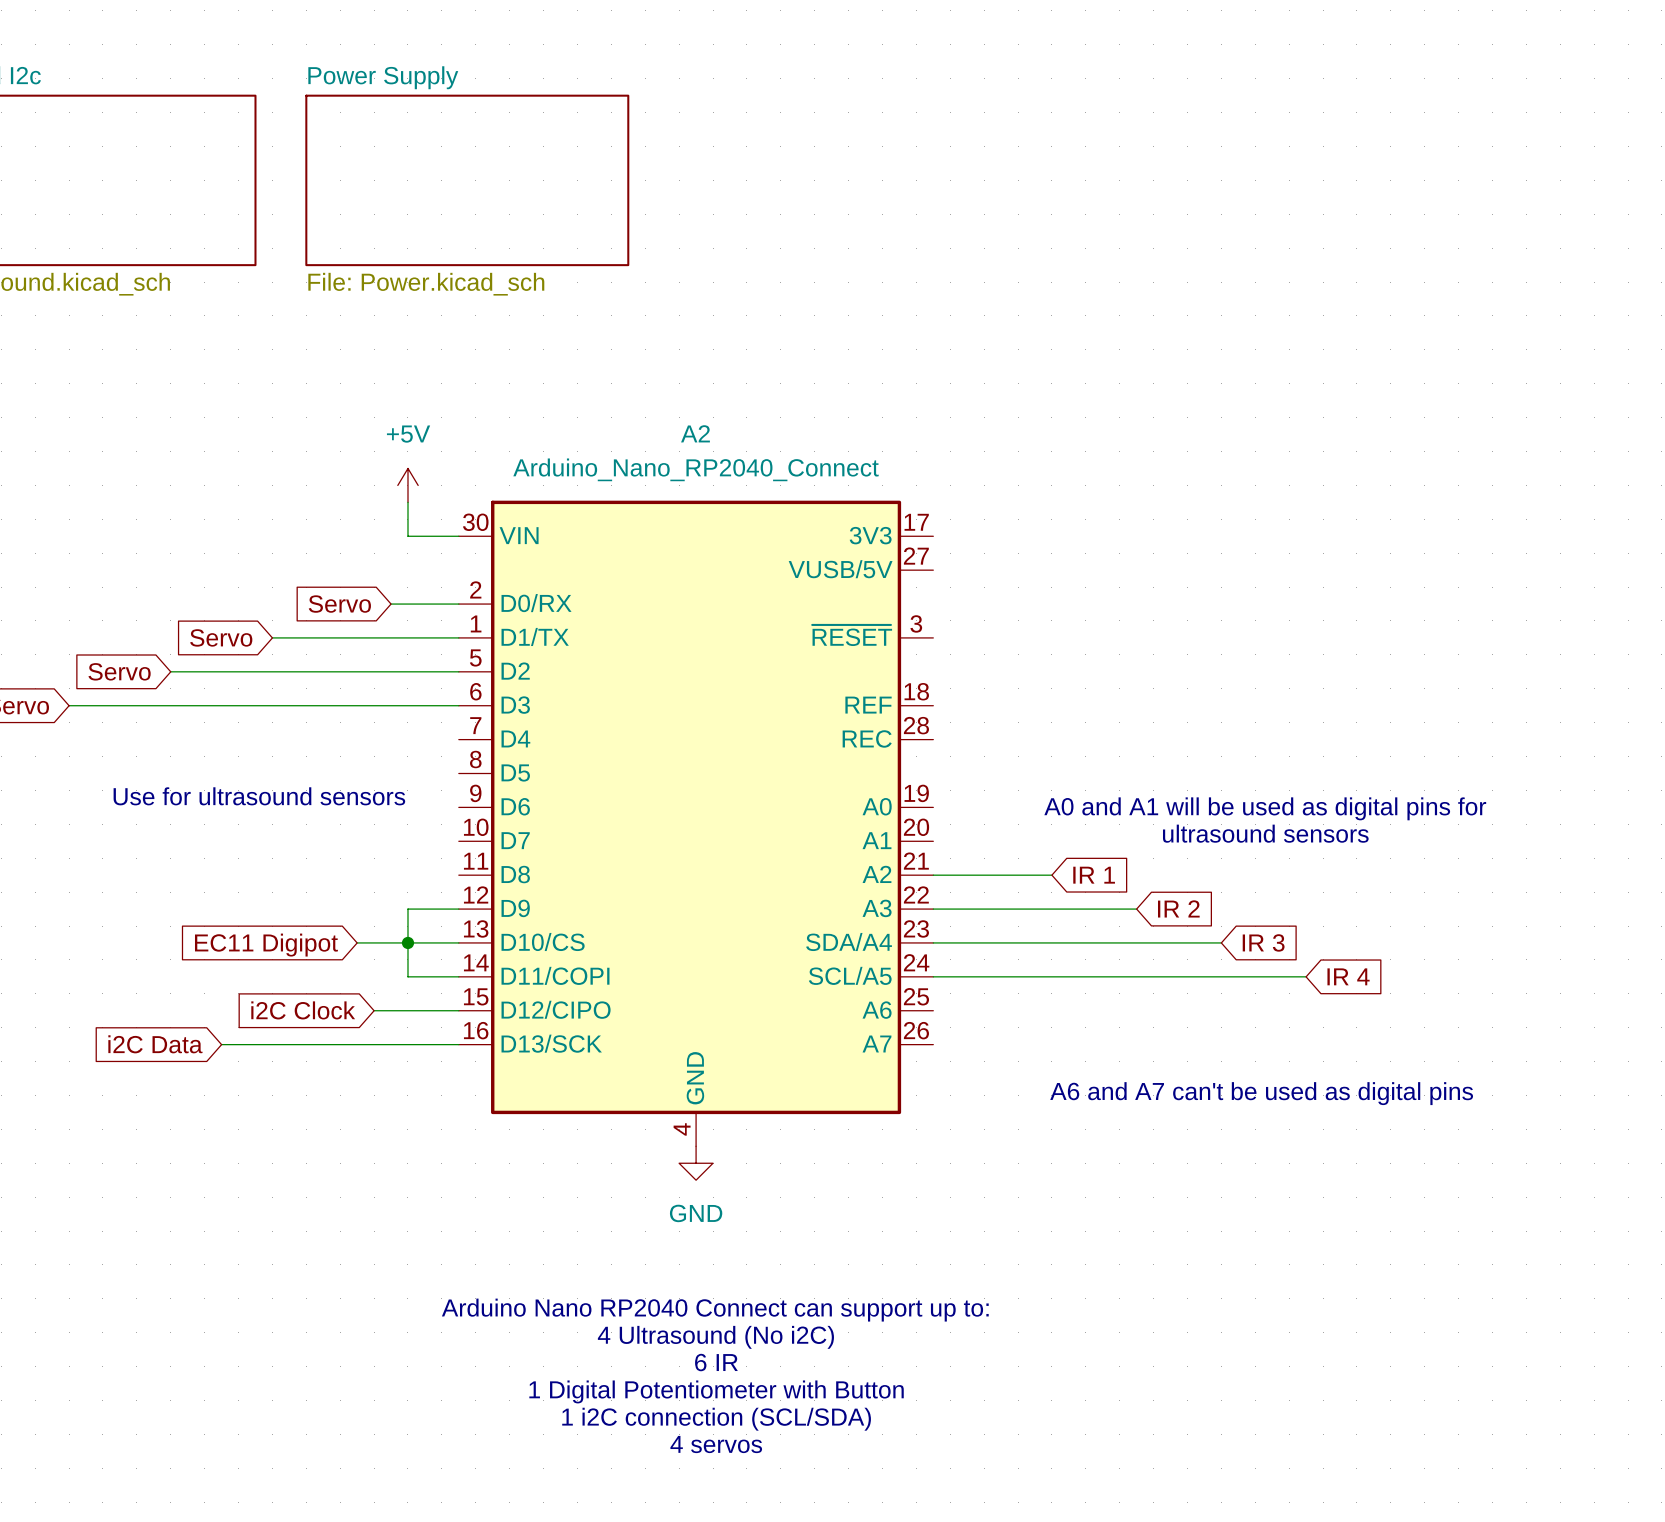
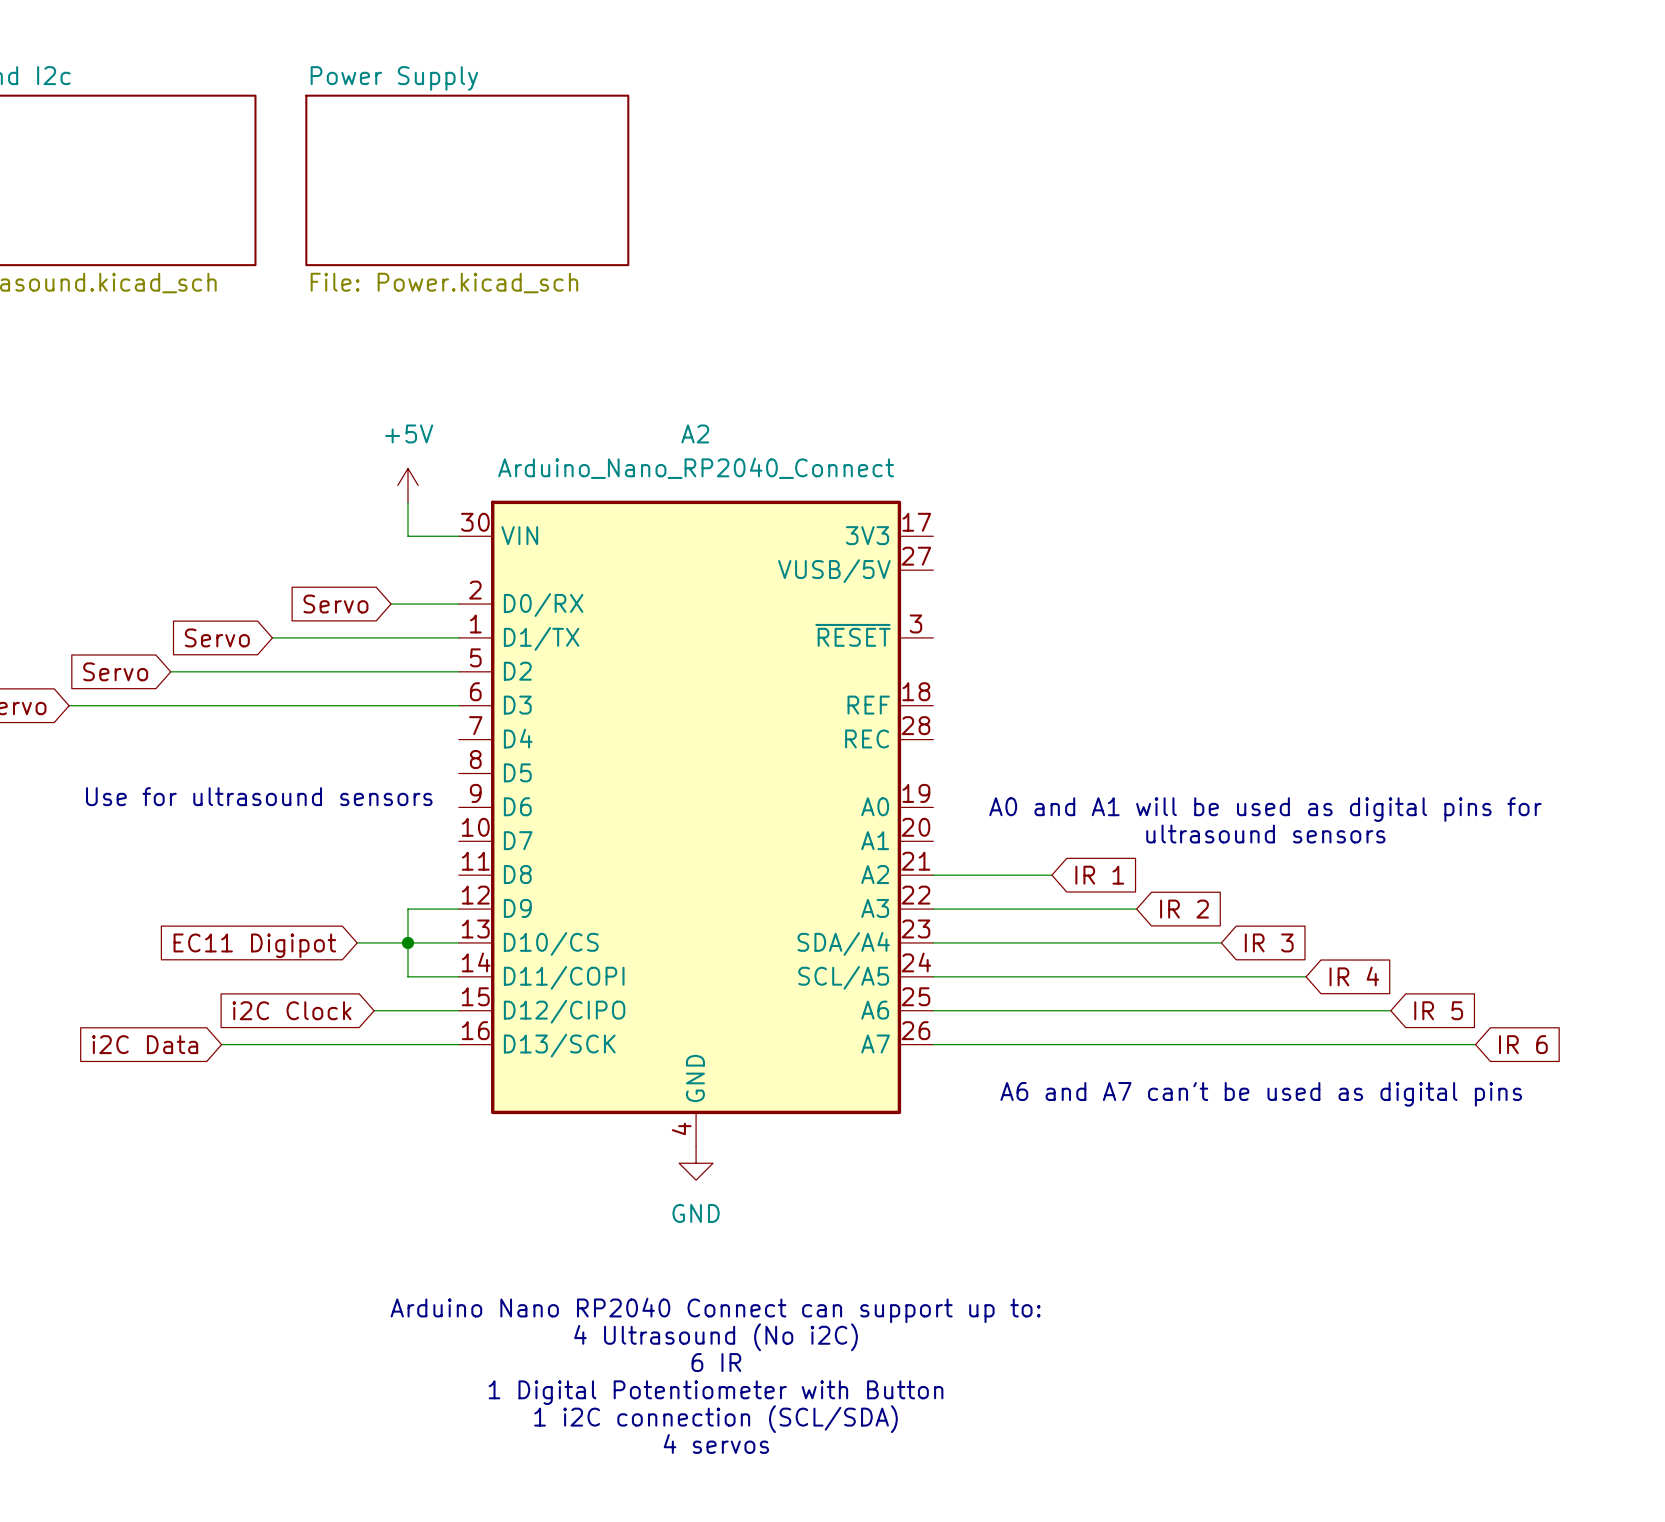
wire: none -> (933, 1010) (1390, 1010)
global label: none -> IR 5 (1438, 1010)
wire: none -> (933, 1044) (1475, 1044)
global label: none -> IR 6 (1523, 1044)

